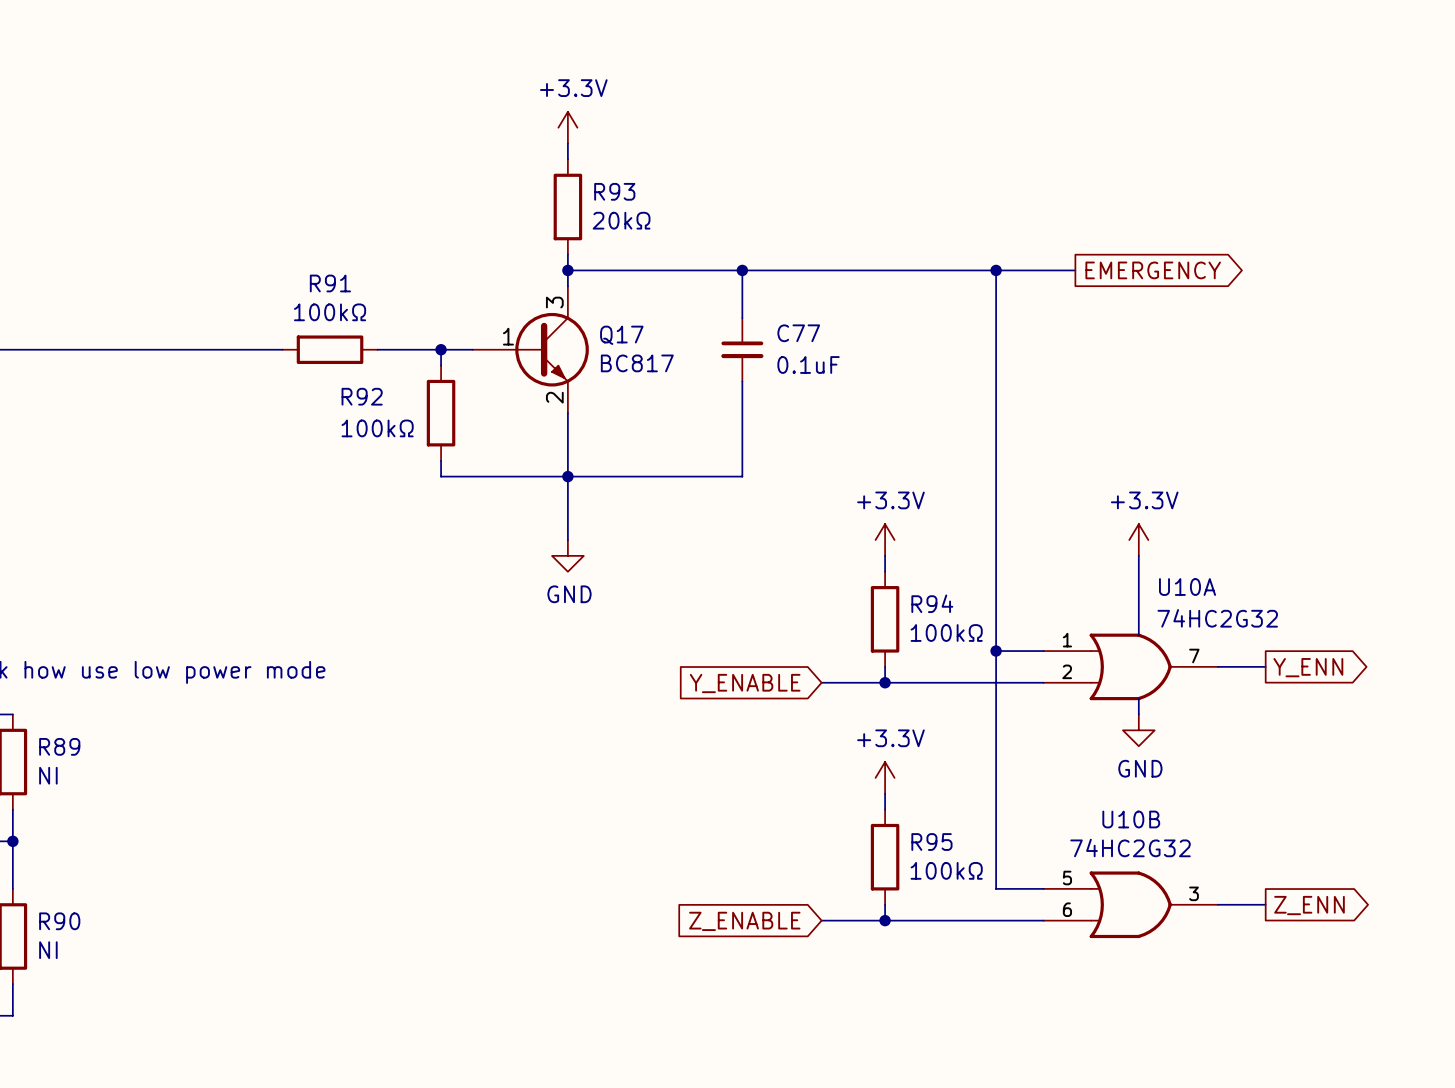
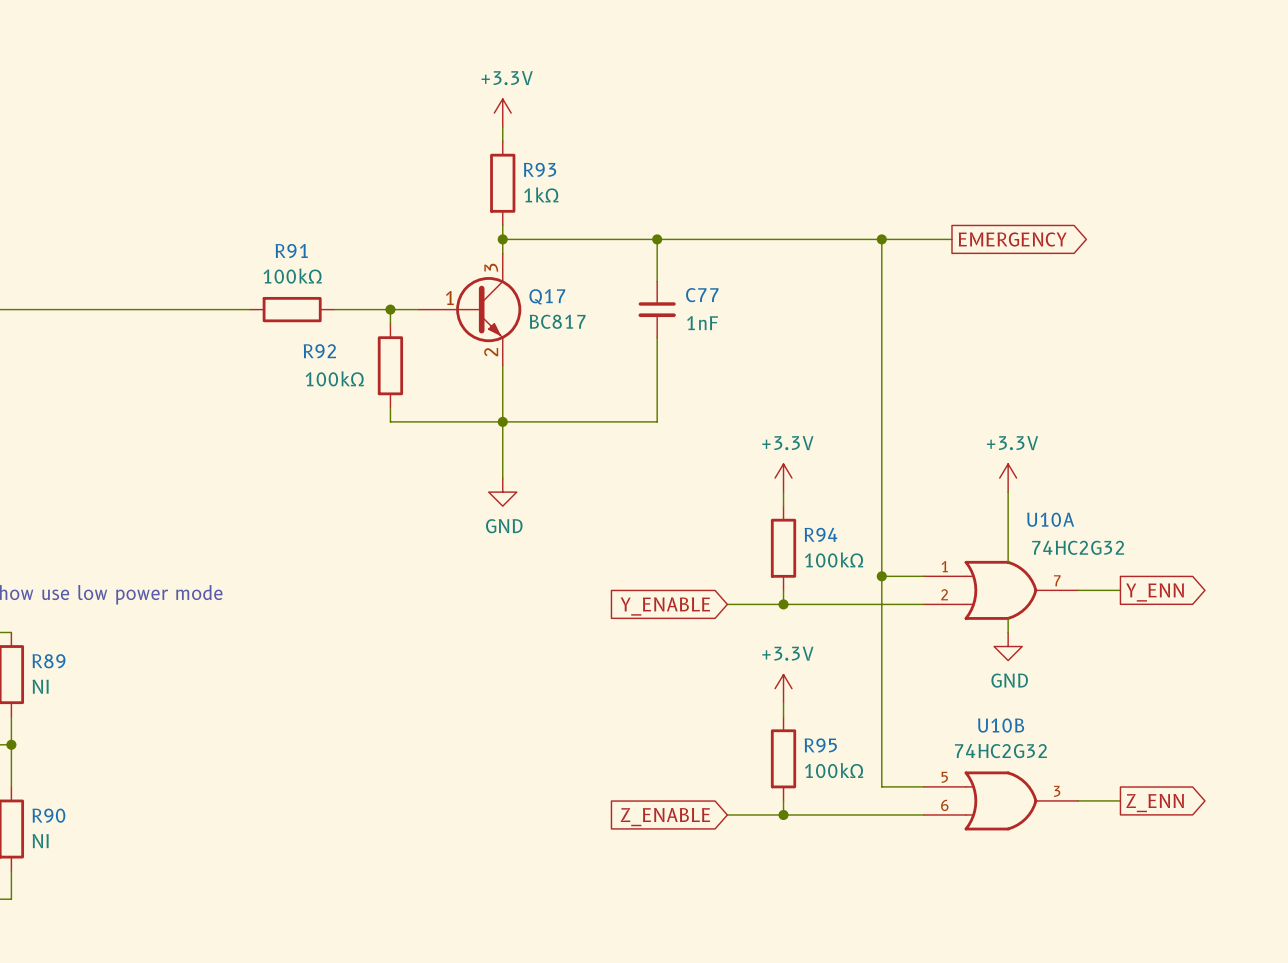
R93 value: 20kΩ (621, 220) -> 1kΩ (541, 194)
C77 value: 0.1uF (808, 364) -> 1nF (702, 323)

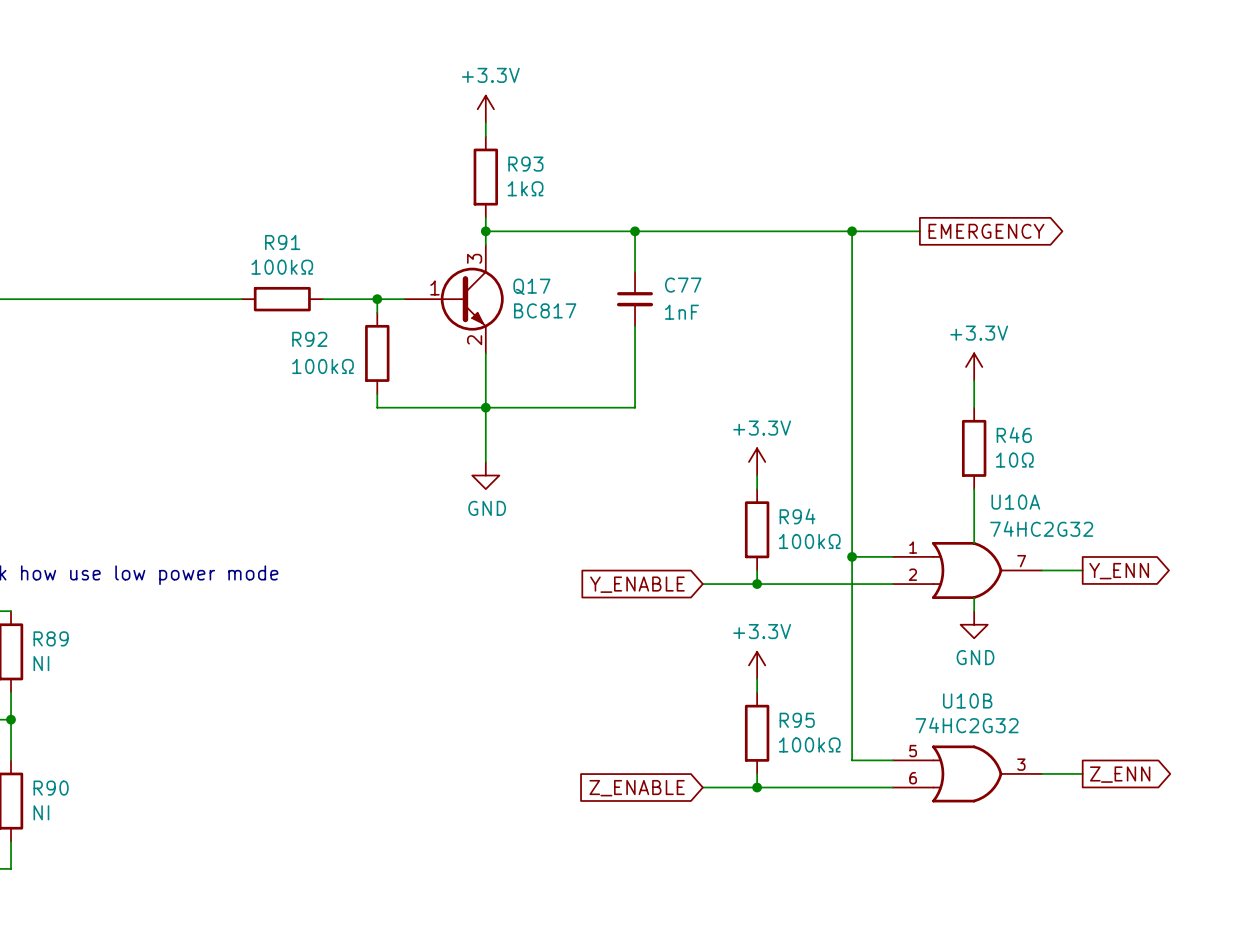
wire: none -> (974, 380) (974, 407)
R46: none -> 10Ω (974, 448)
power symbol position: +3.3V (1008, 478) -> +3.3V (974, 366)

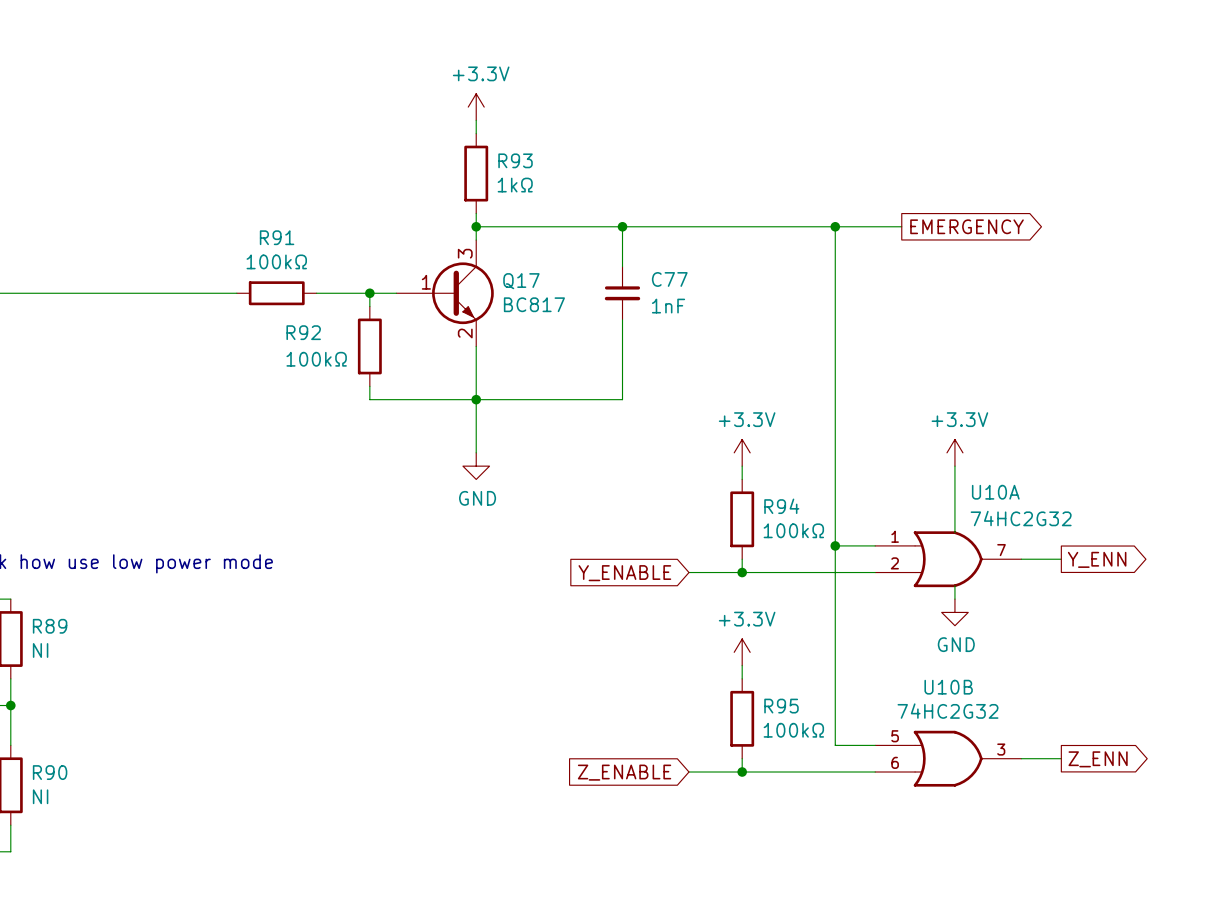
power symbol position: +3.3V (974, 366) -> +3.3V (954, 452)
wire: (974, 380) (974, 407) -> none
R46: 10Ω (974, 448) -> none

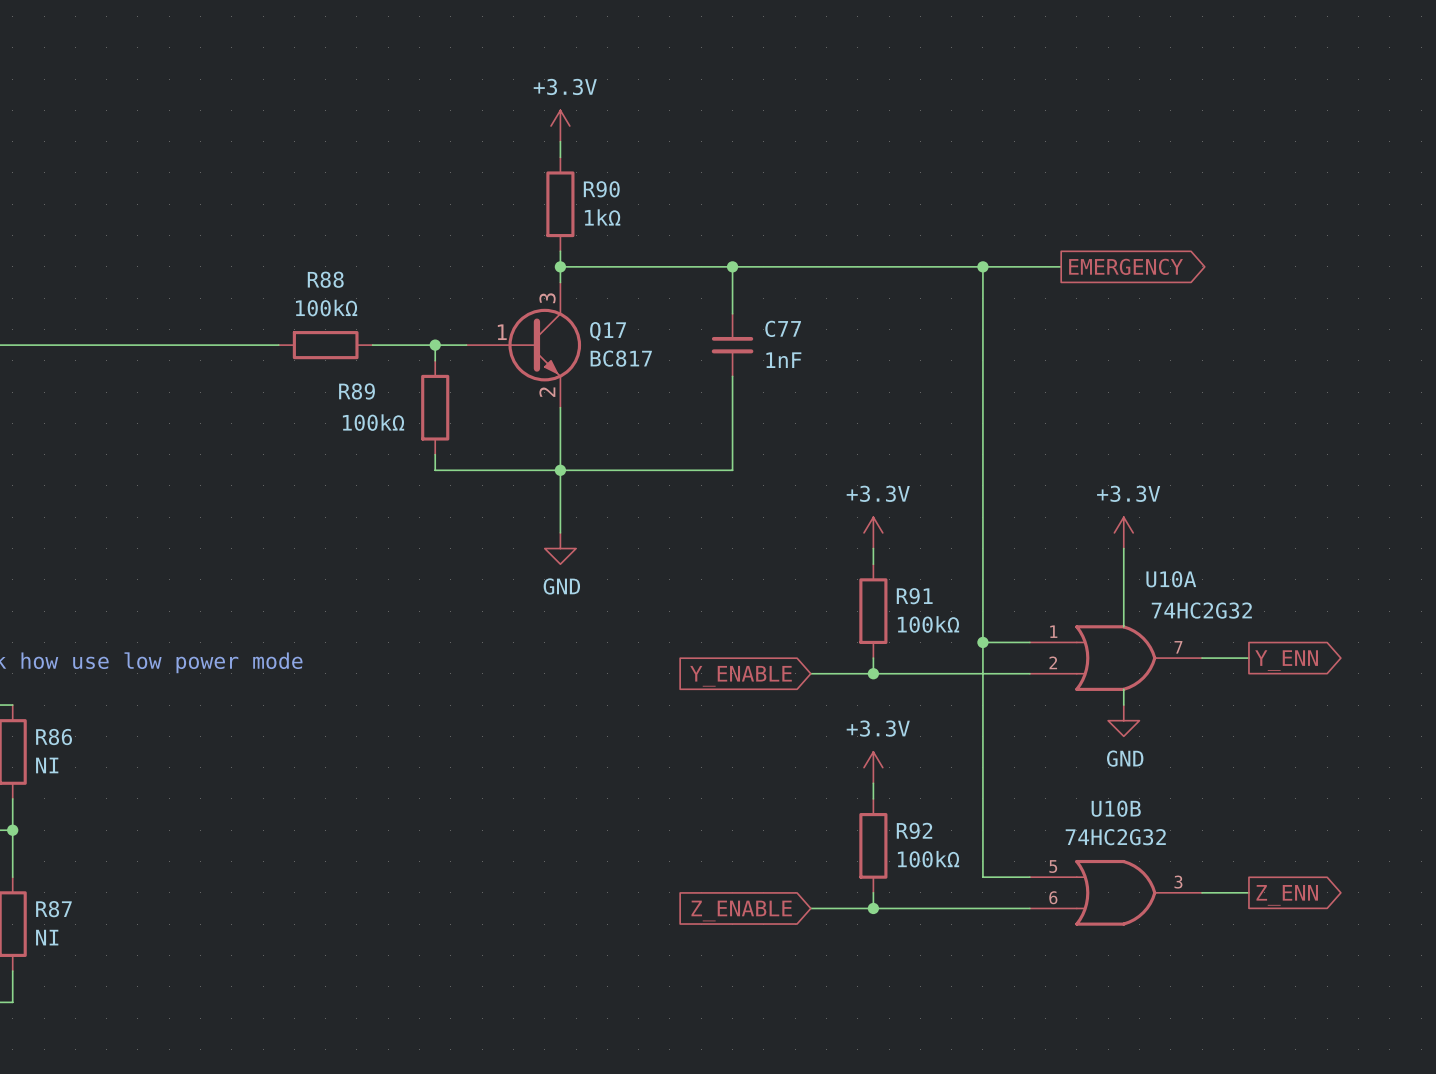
R93 name: R93 (515, 160) -> R90 (601, 189)
R91 name: R91 (277, 237) -> R88 (325, 279)
R92 name: R92 (303, 332) -> R89 (357, 391)
R94 name: R94 (781, 506) -> R91 (914, 596)
R89 name: R89 (50, 626) -> R86 (54, 737)
R95 name: R95 (781, 706) -> R92 (914, 830)
R90 name: R90 (50, 772) -> R87 (53, 909)

